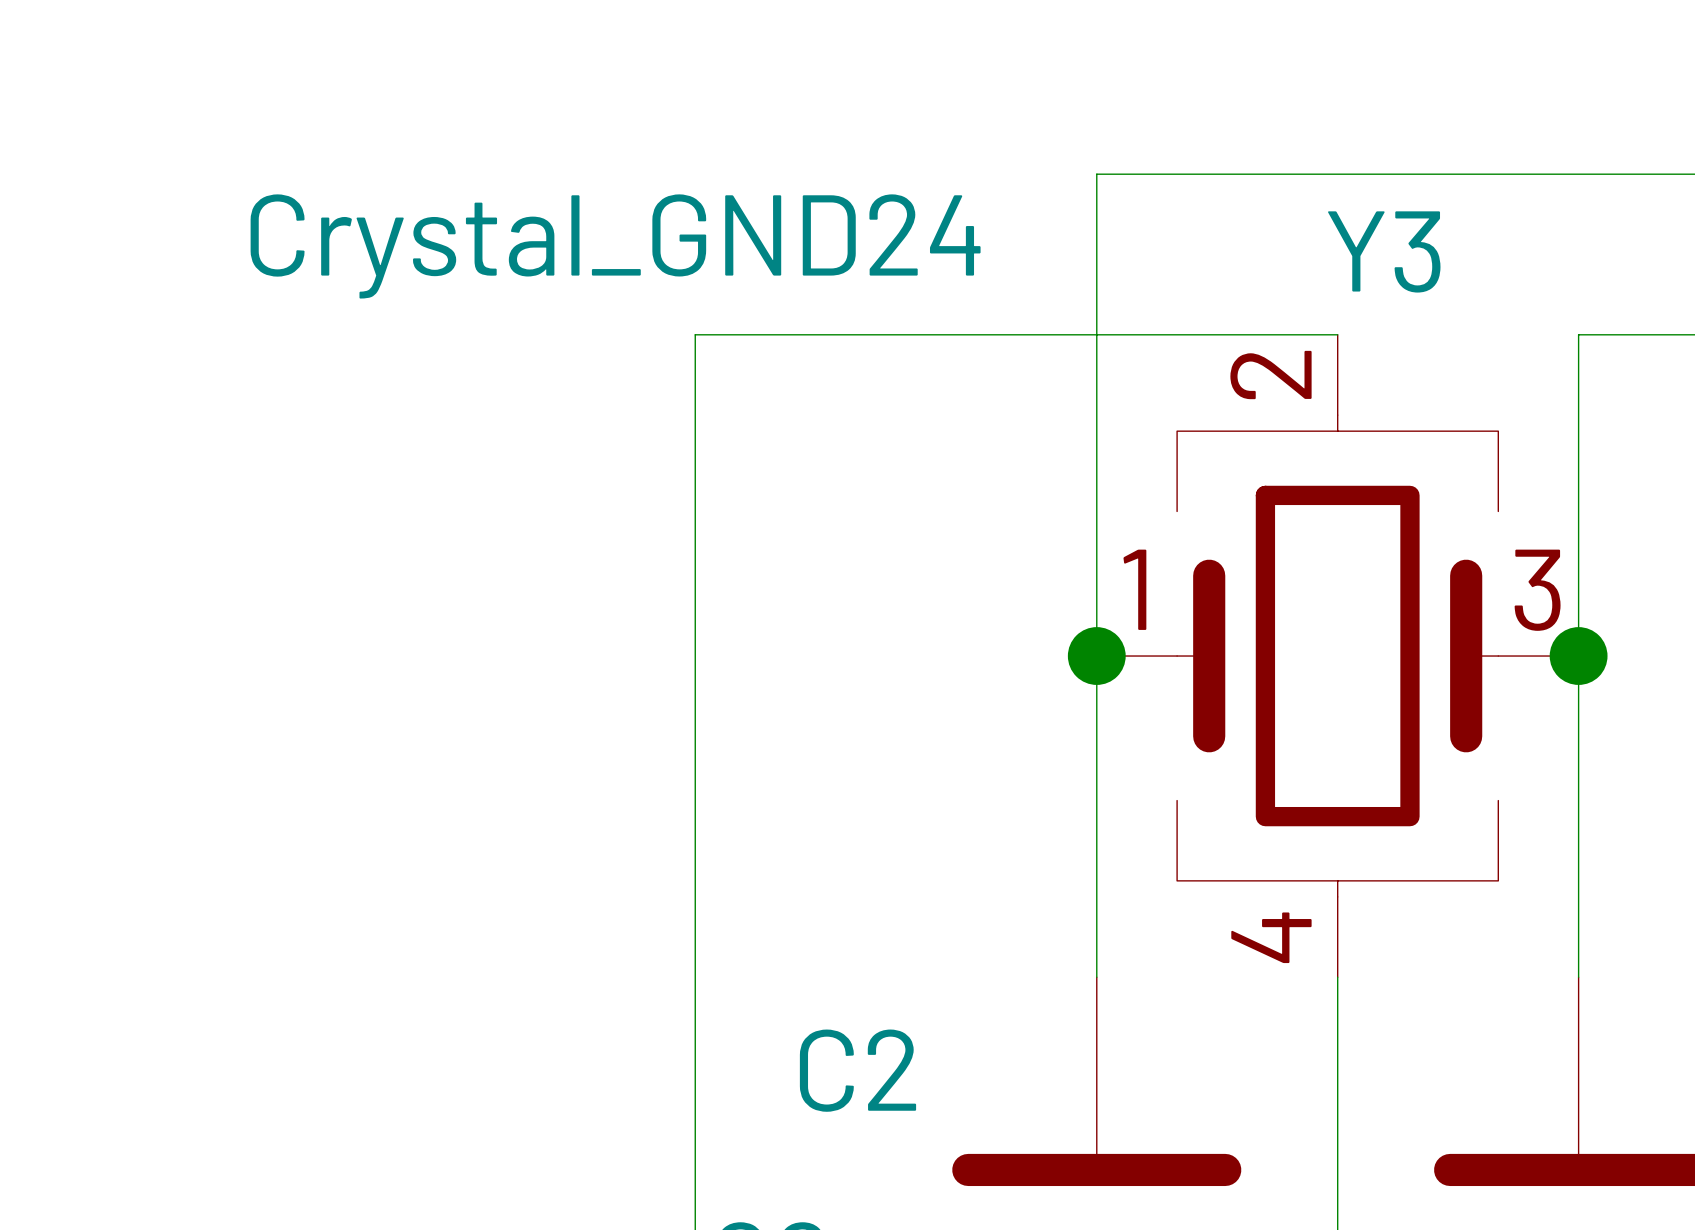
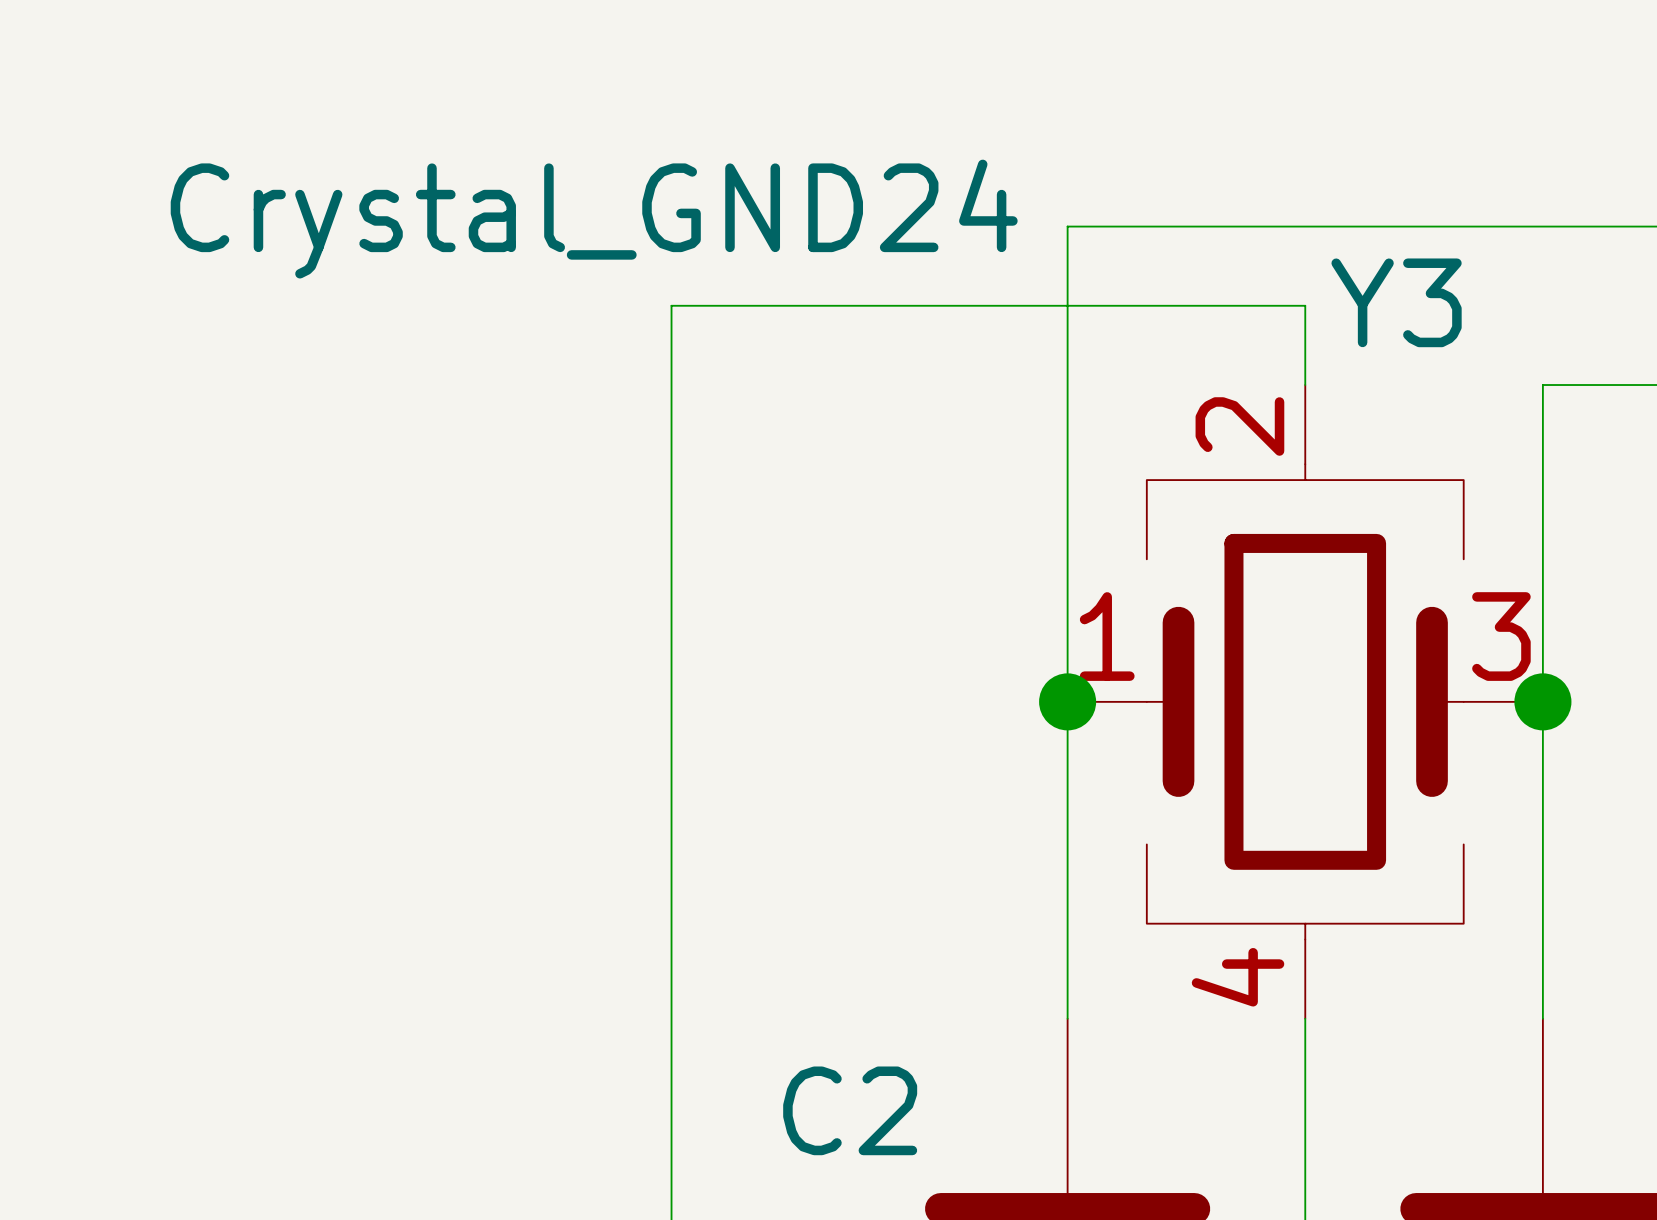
Y3 value position: Crystal_GND24 (615, 246) -> Crystal_GND24 (594, 219)
Y3 name position: Y3 (1384, 251) -> Y3 (1396, 302)
wire: (695, 334) (1337, 334) -> (671, 385) (671, 305) (1305, 305) (1305, 385)

